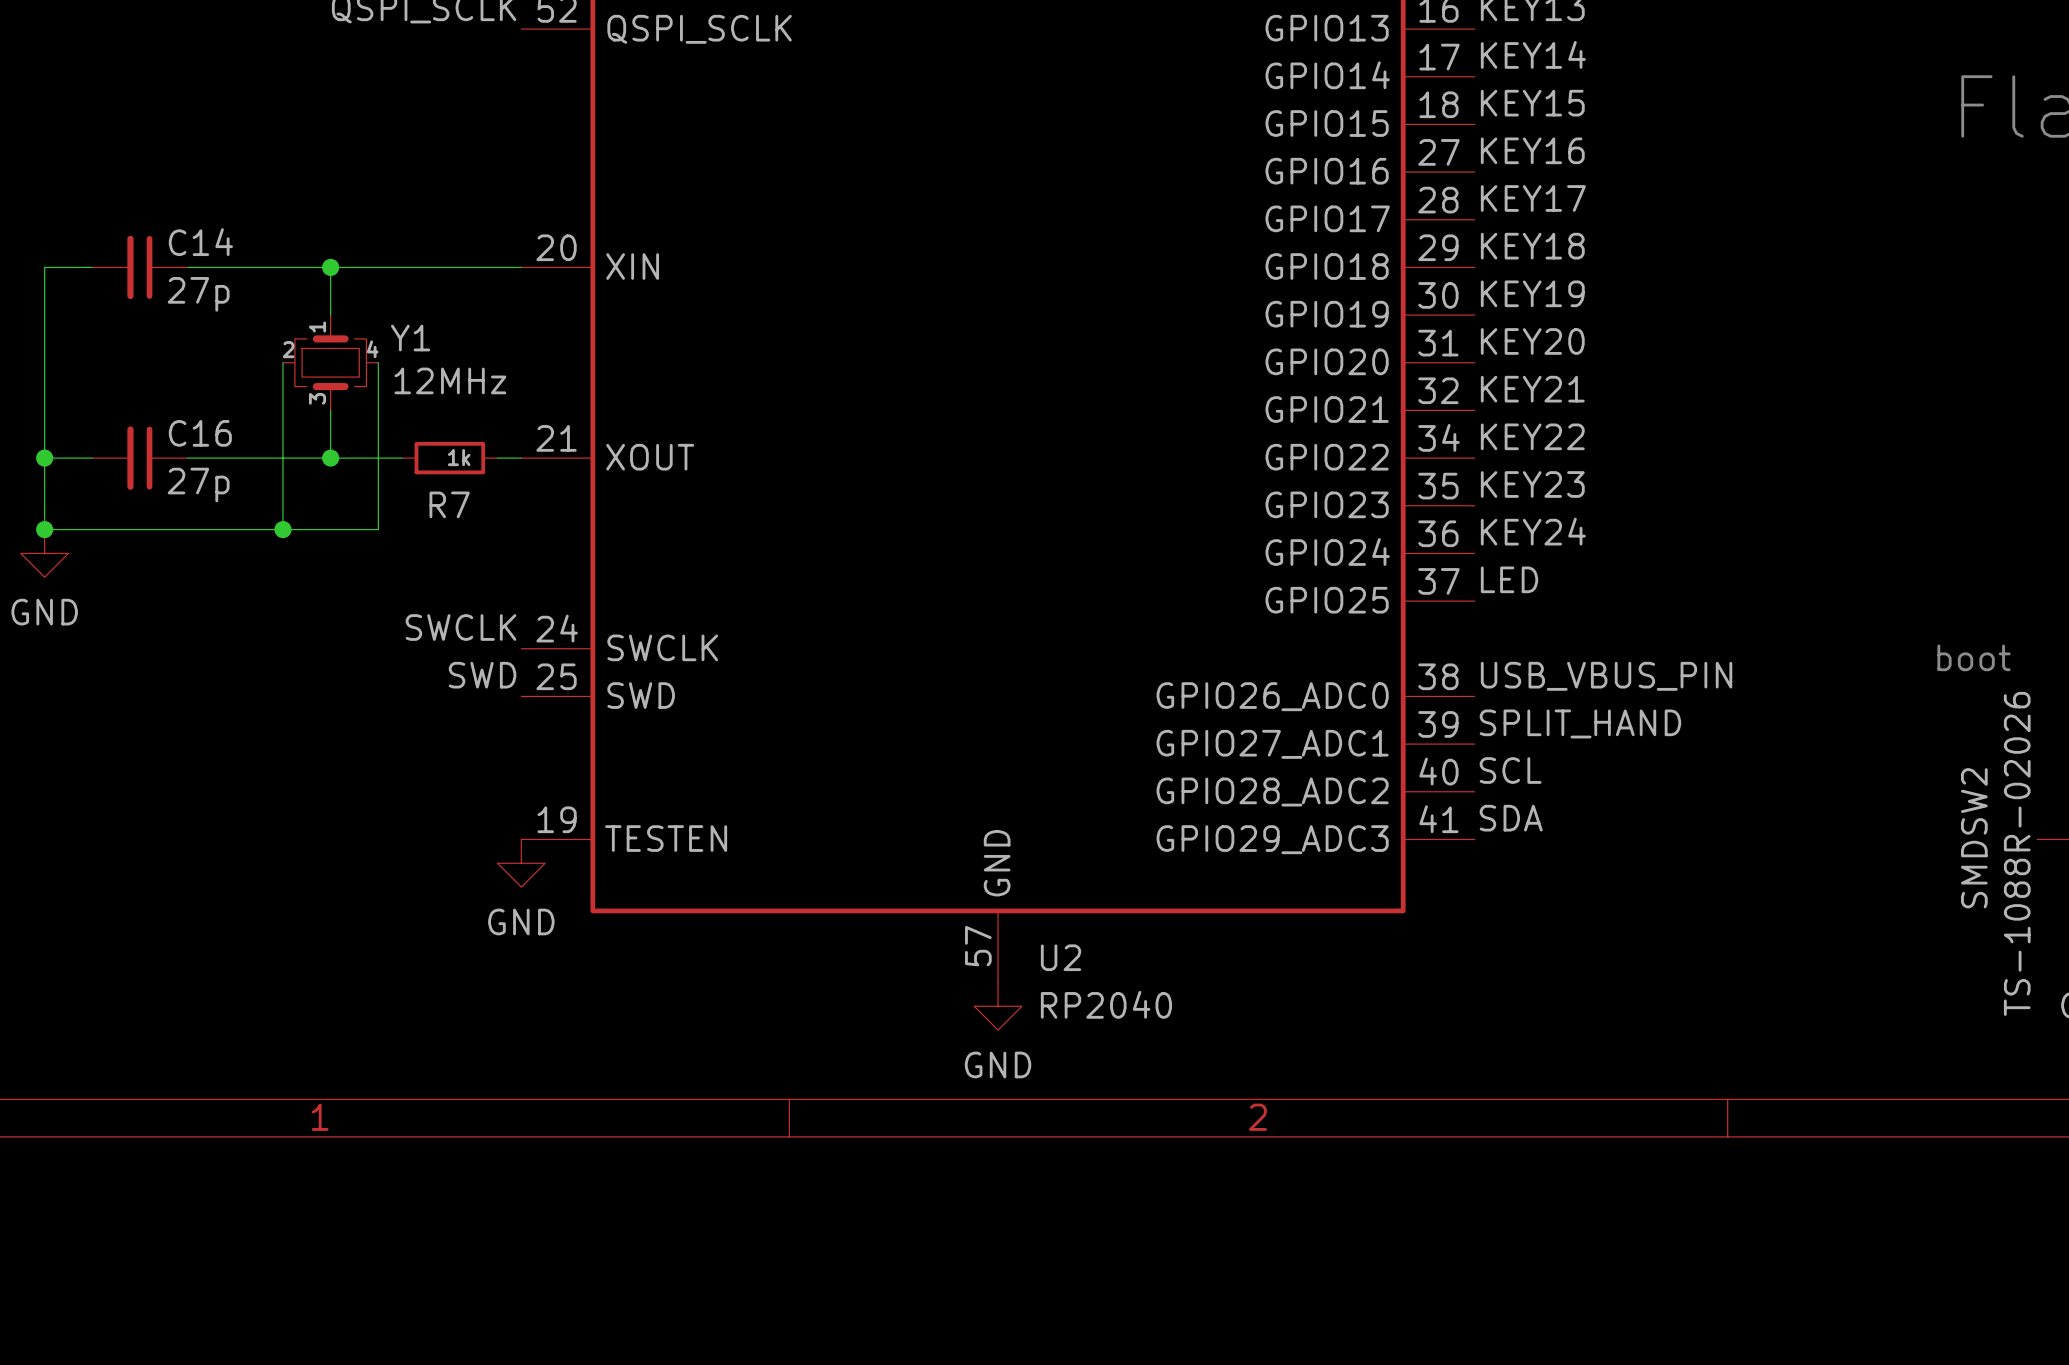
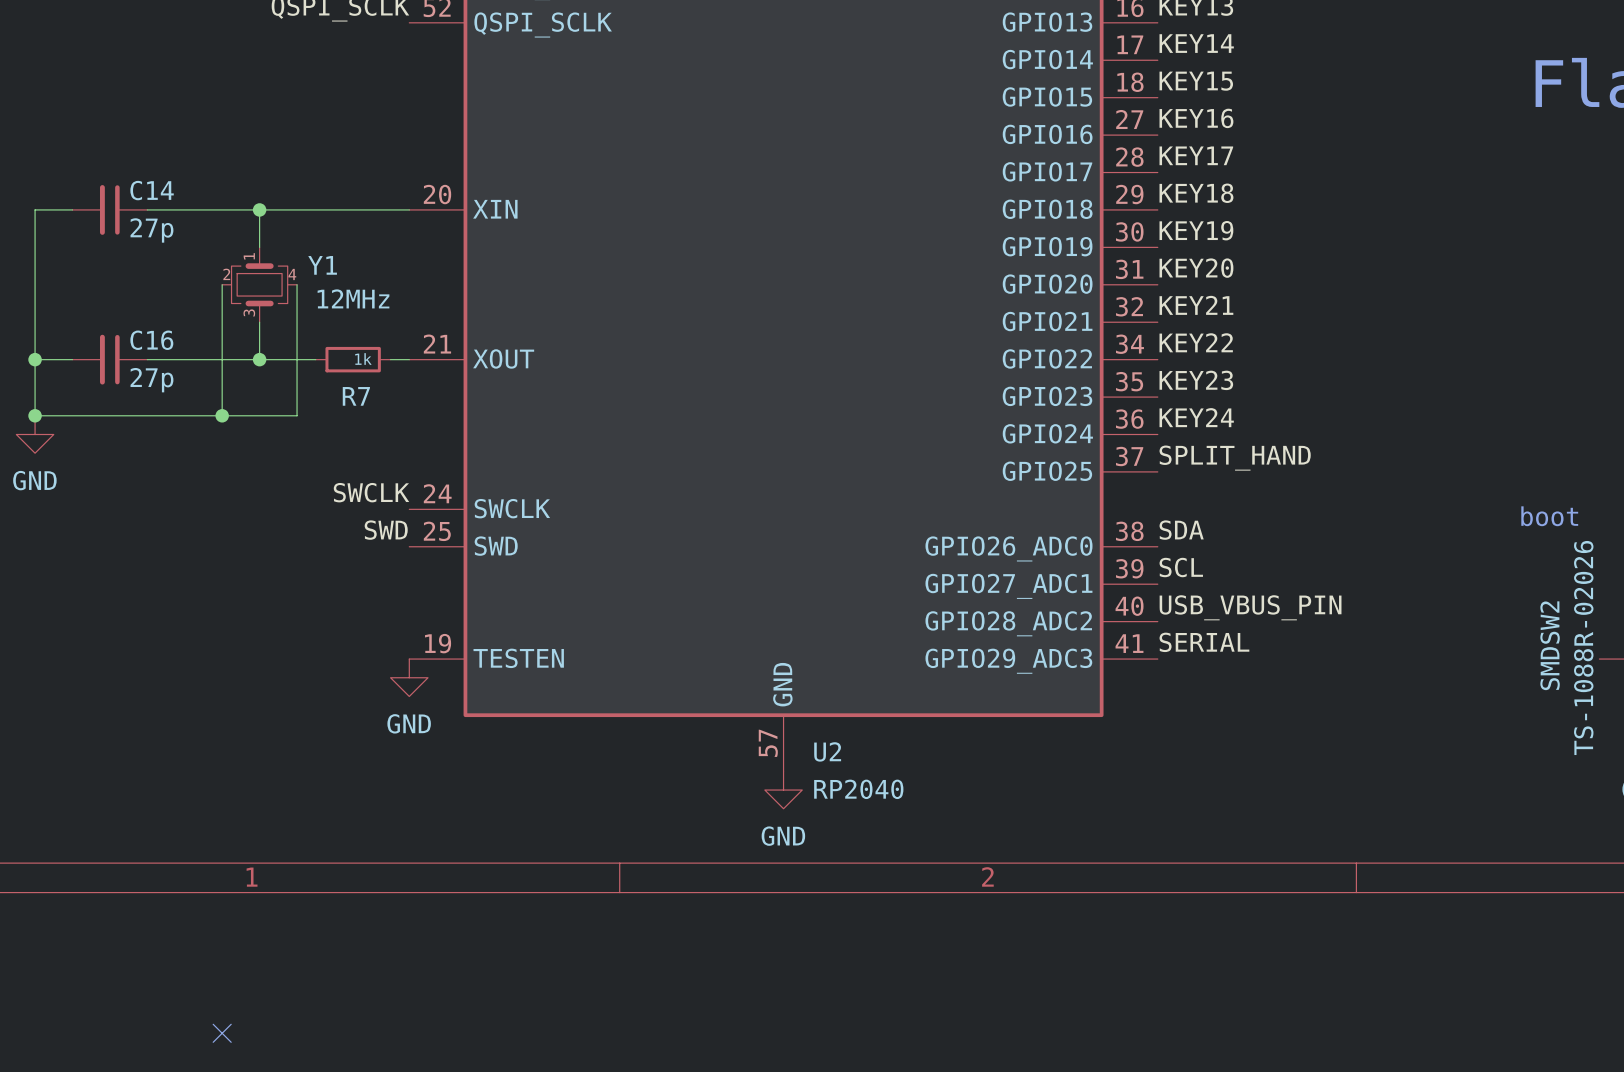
label: LED (1509, 579) -> SPLIT_HAND (1235, 458)
label: USB_VBUS_PIN (1606, 676) -> SDA (1181, 530)
label: SPLIT_HAND (1580, 723) -> SCL (1181, 567)
label: SCL (1510, 770) -> USB_VBUS_PIN (1250, 607)
label: SDA (1511, 818) -> SERIAL (1204, 642)
no-connect mark: none -> (222, 1033)

